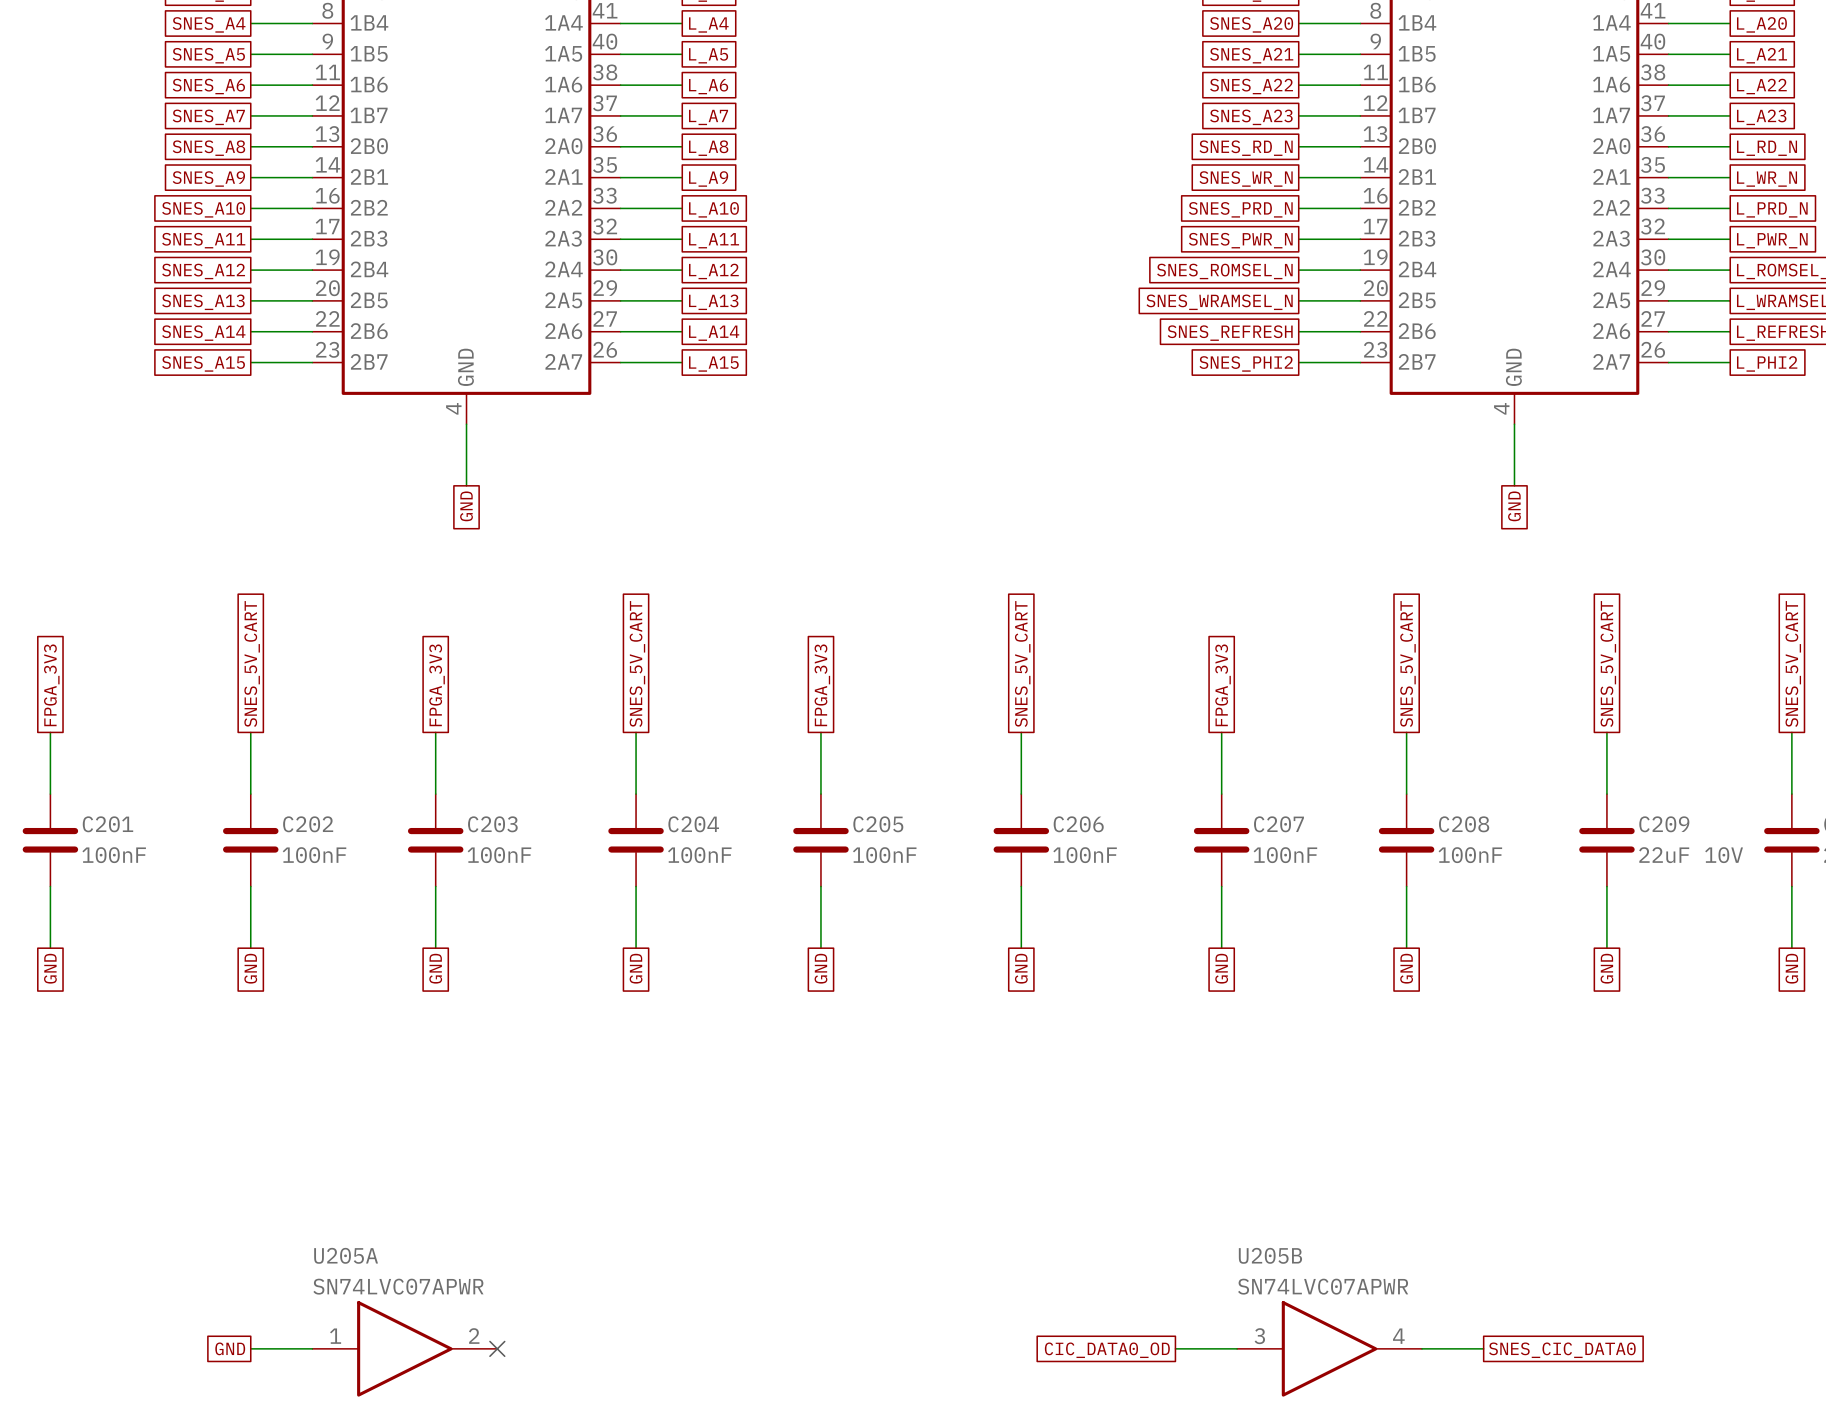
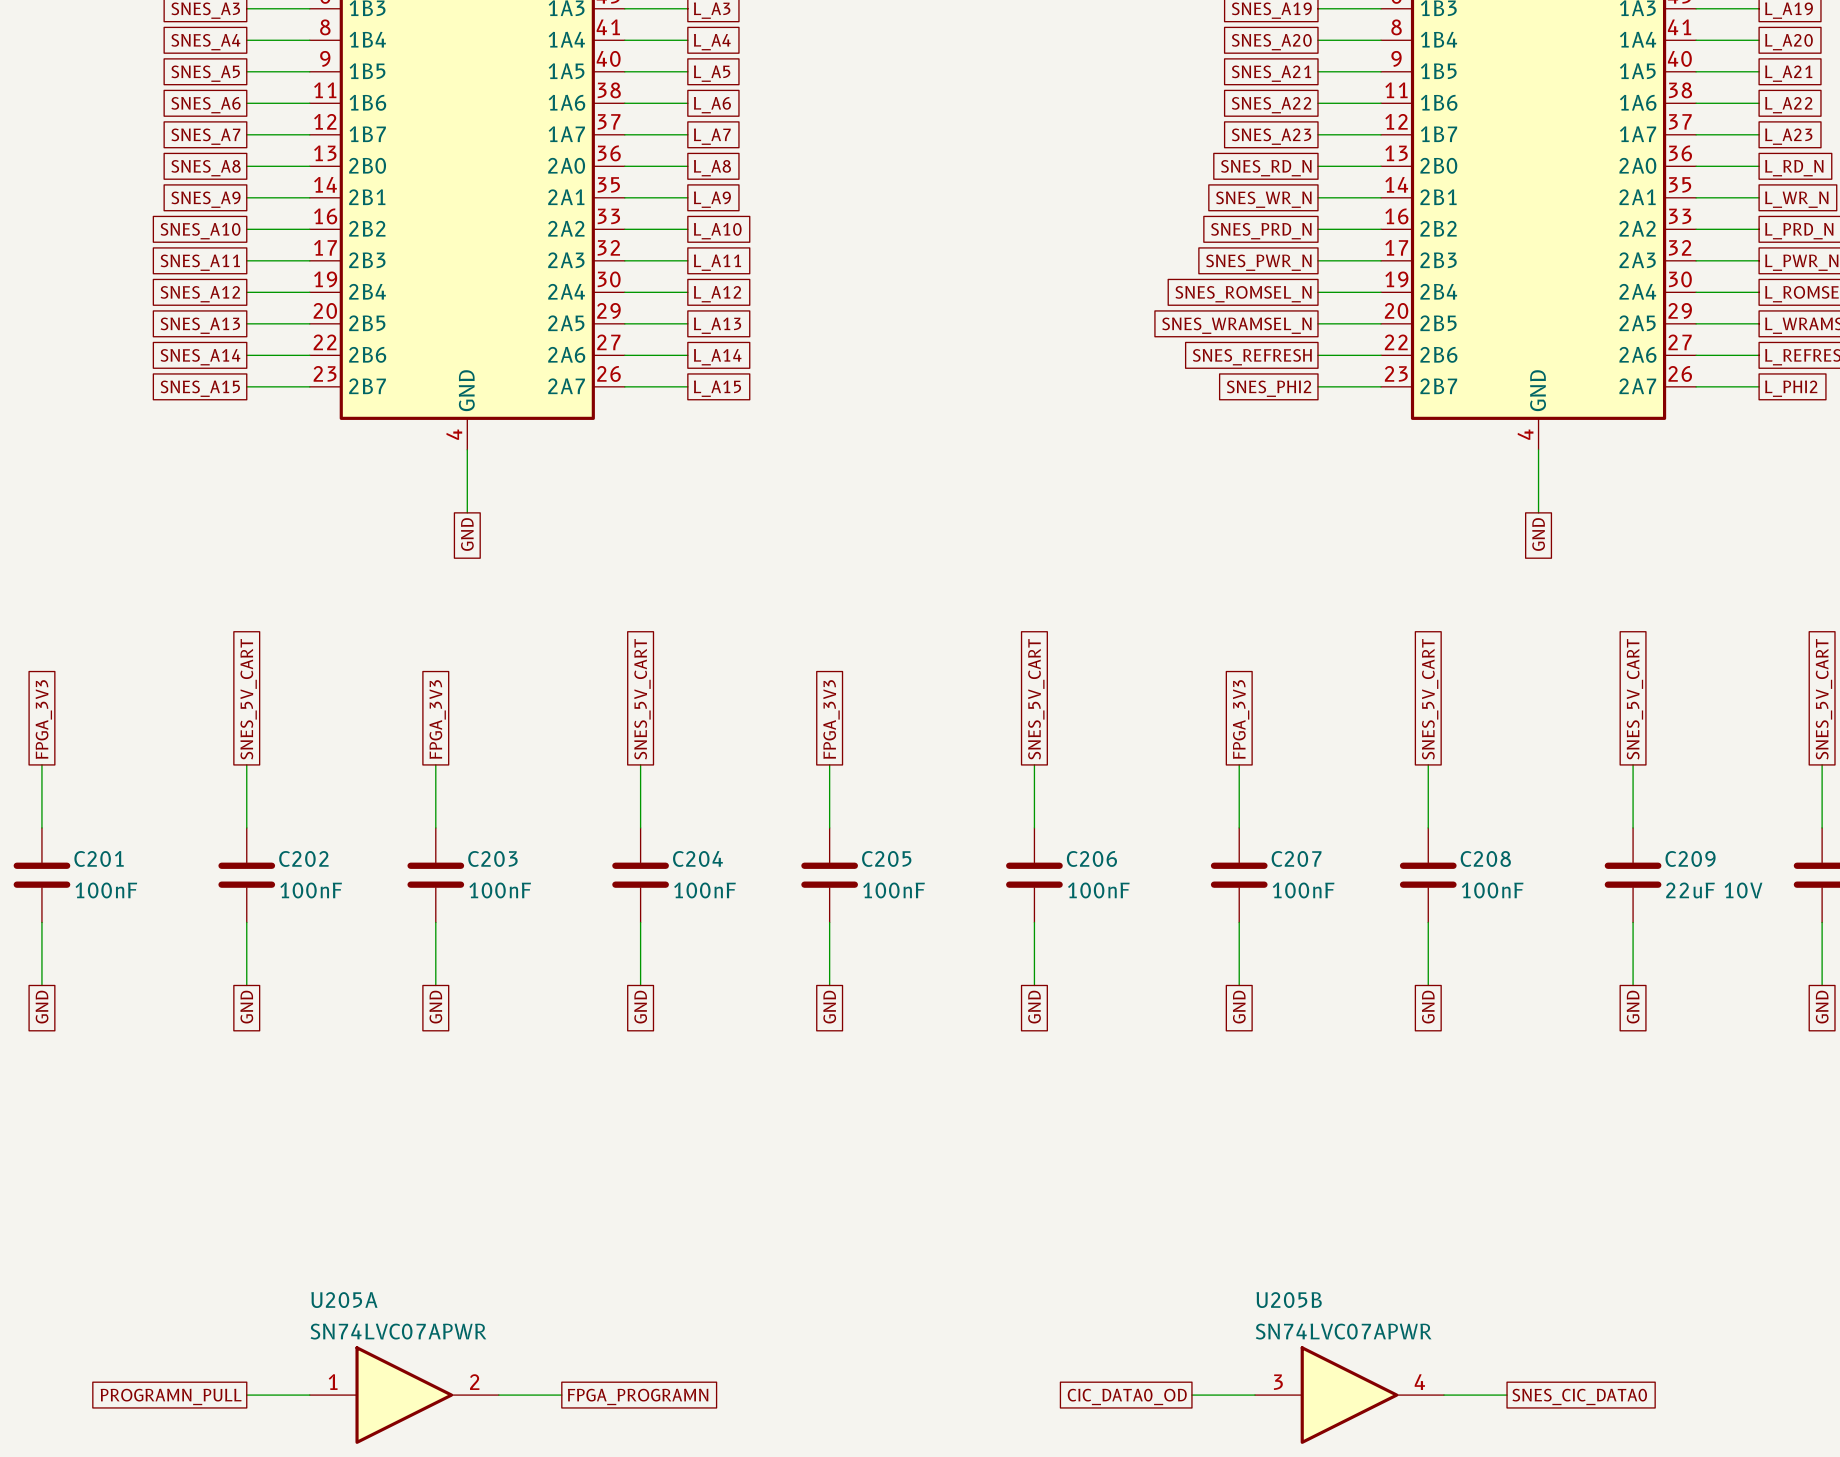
global label: GND (230, 1348) -> PROGRAMN_PULL (171, 1396)
wire: none -> (498, 1395) (561, 1395)
no-connect mark: (497, 1348) -> none
global label: none -> FPGA_PROGRAMN (638, 1396)

